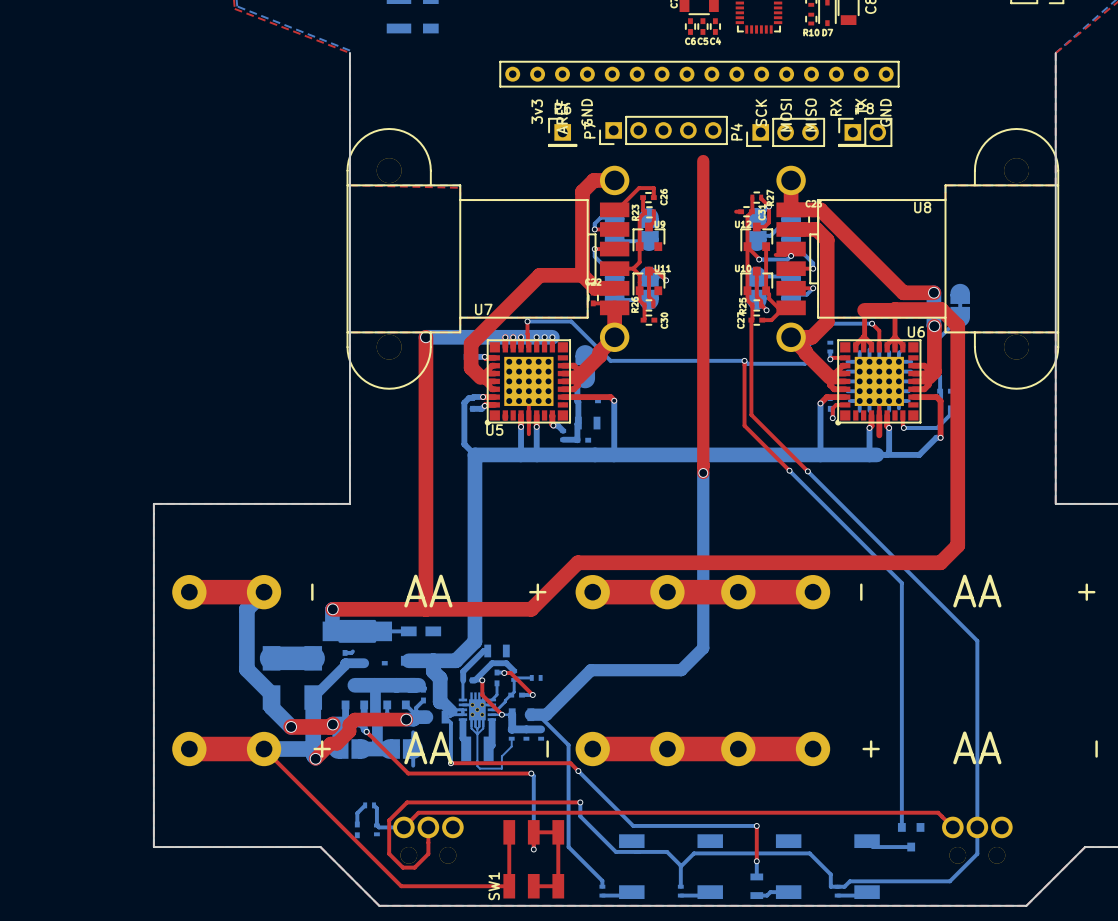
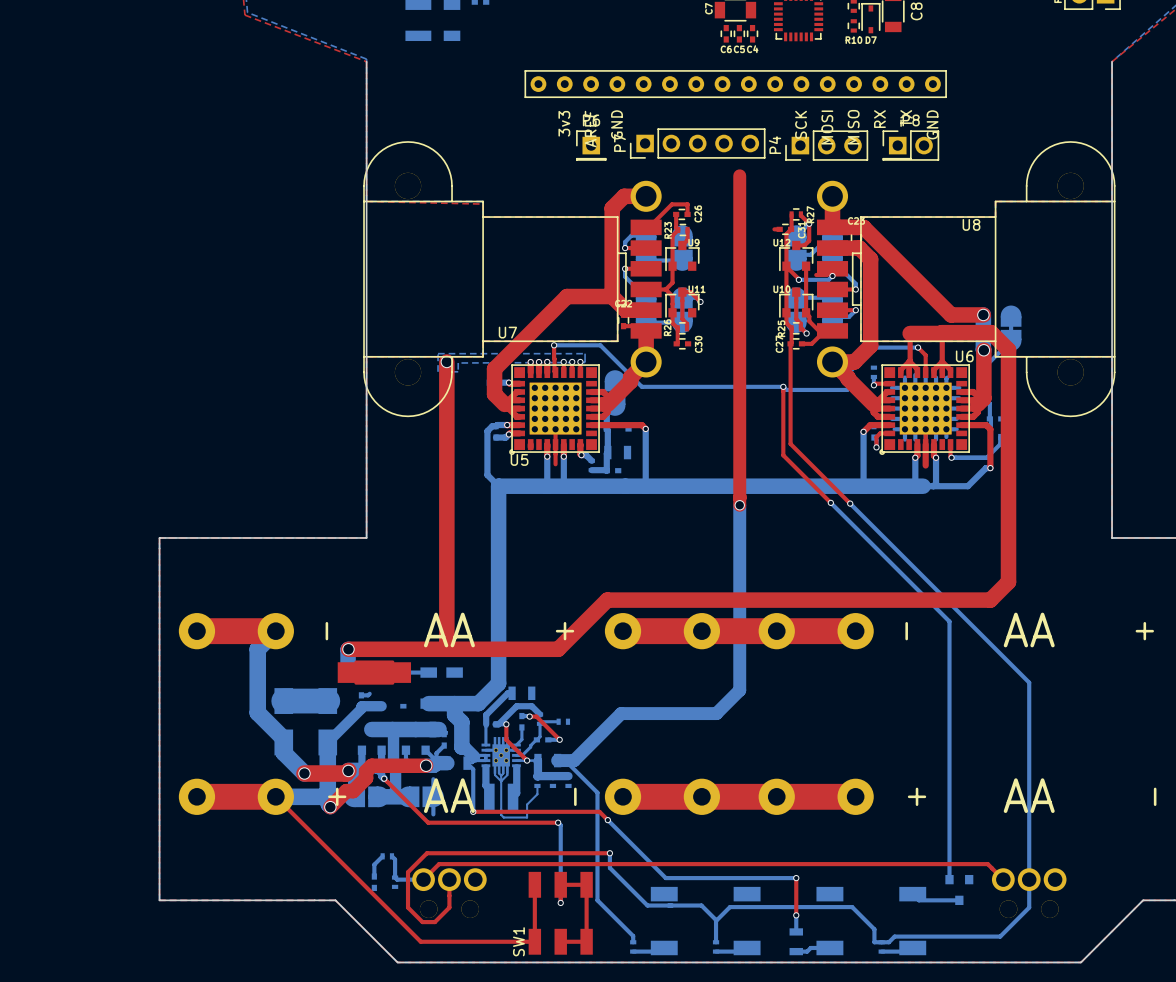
bottom zone outline: none -> (438, 353) (438, 371) (458, 371) (458, 363) (585, 362) (585, 353) (438, 353)
bottom track: (425, 337) (552, 337) -> none
part side: bottom (357, 631) -> top (374, 672)

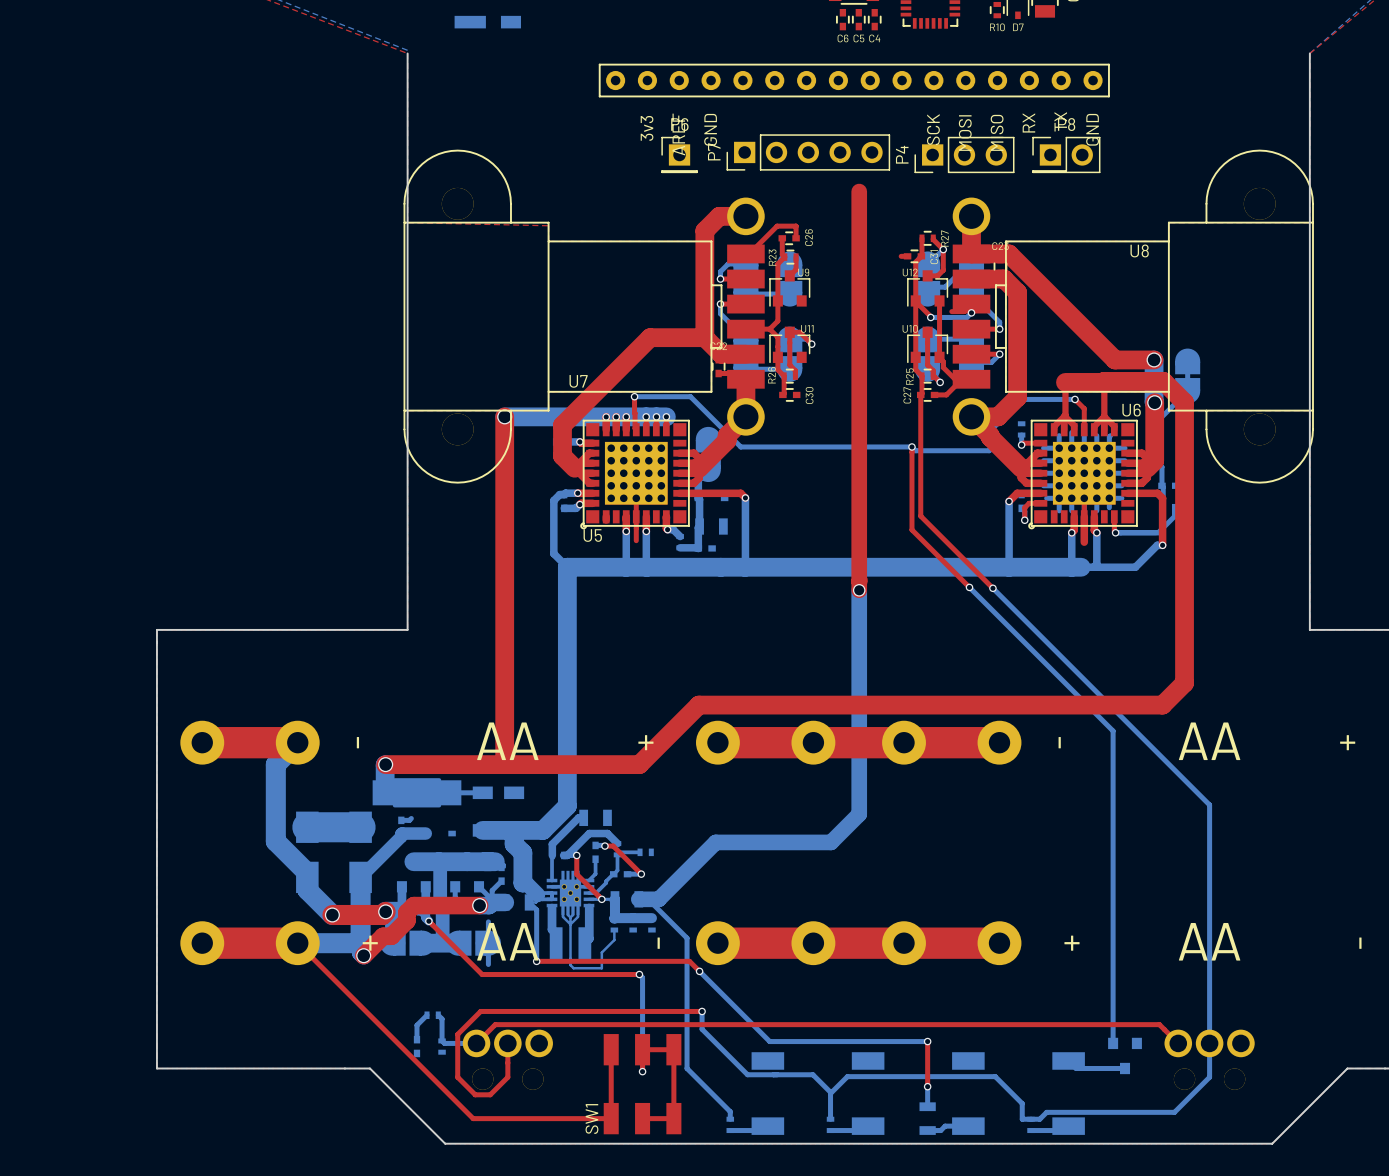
bottom zone outline: (438, 353) (438, 371) (458, 371) (458, 363) (585, 362) (585, 353) (438, 353) -> none
bottom track: none -> (504, 416) (666, 416)
part side: top (374, 672) -> bottom (416, 792)

